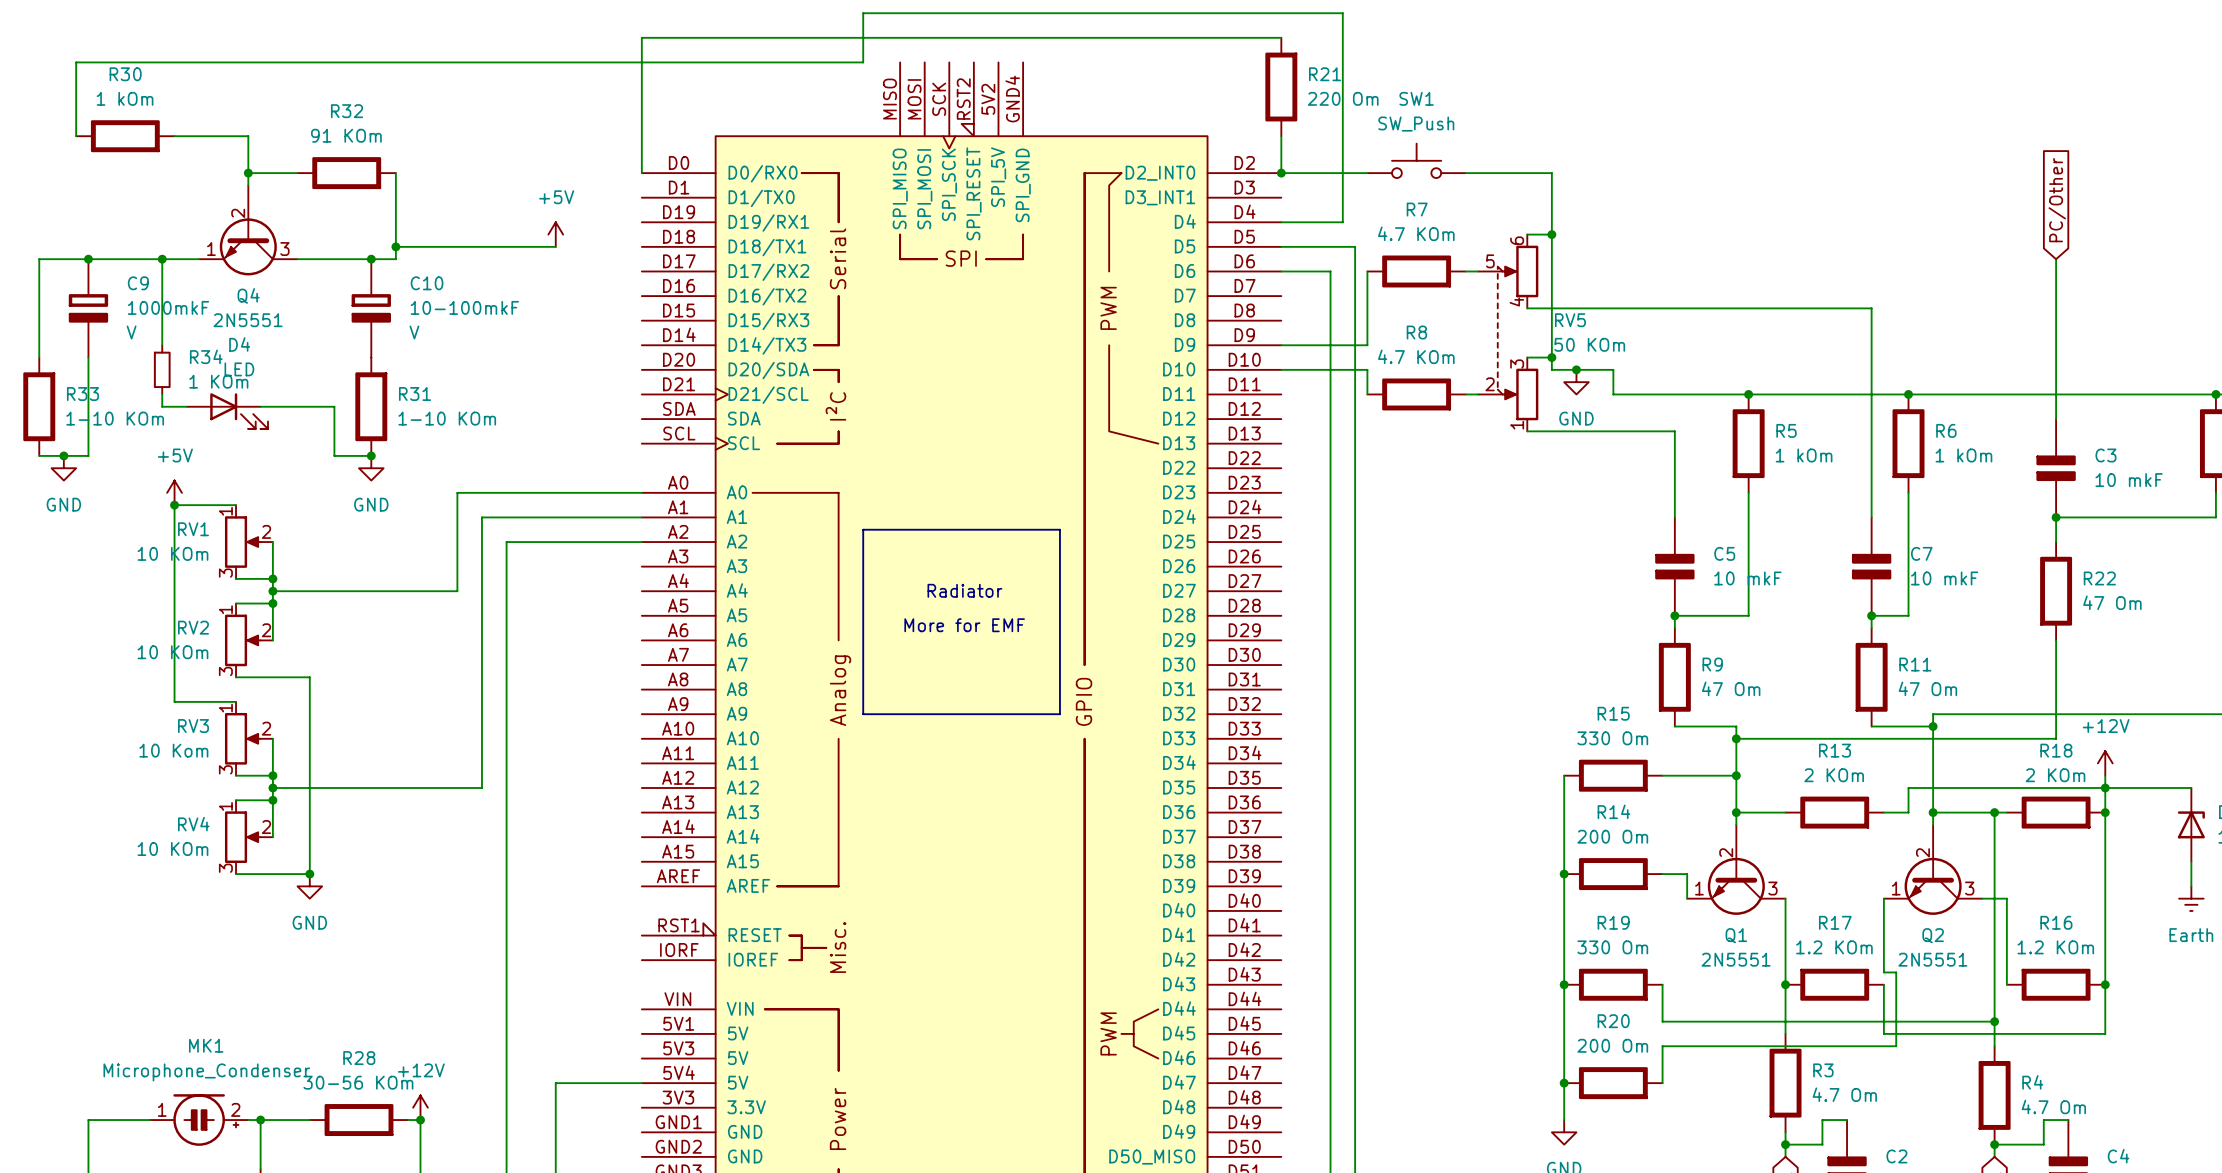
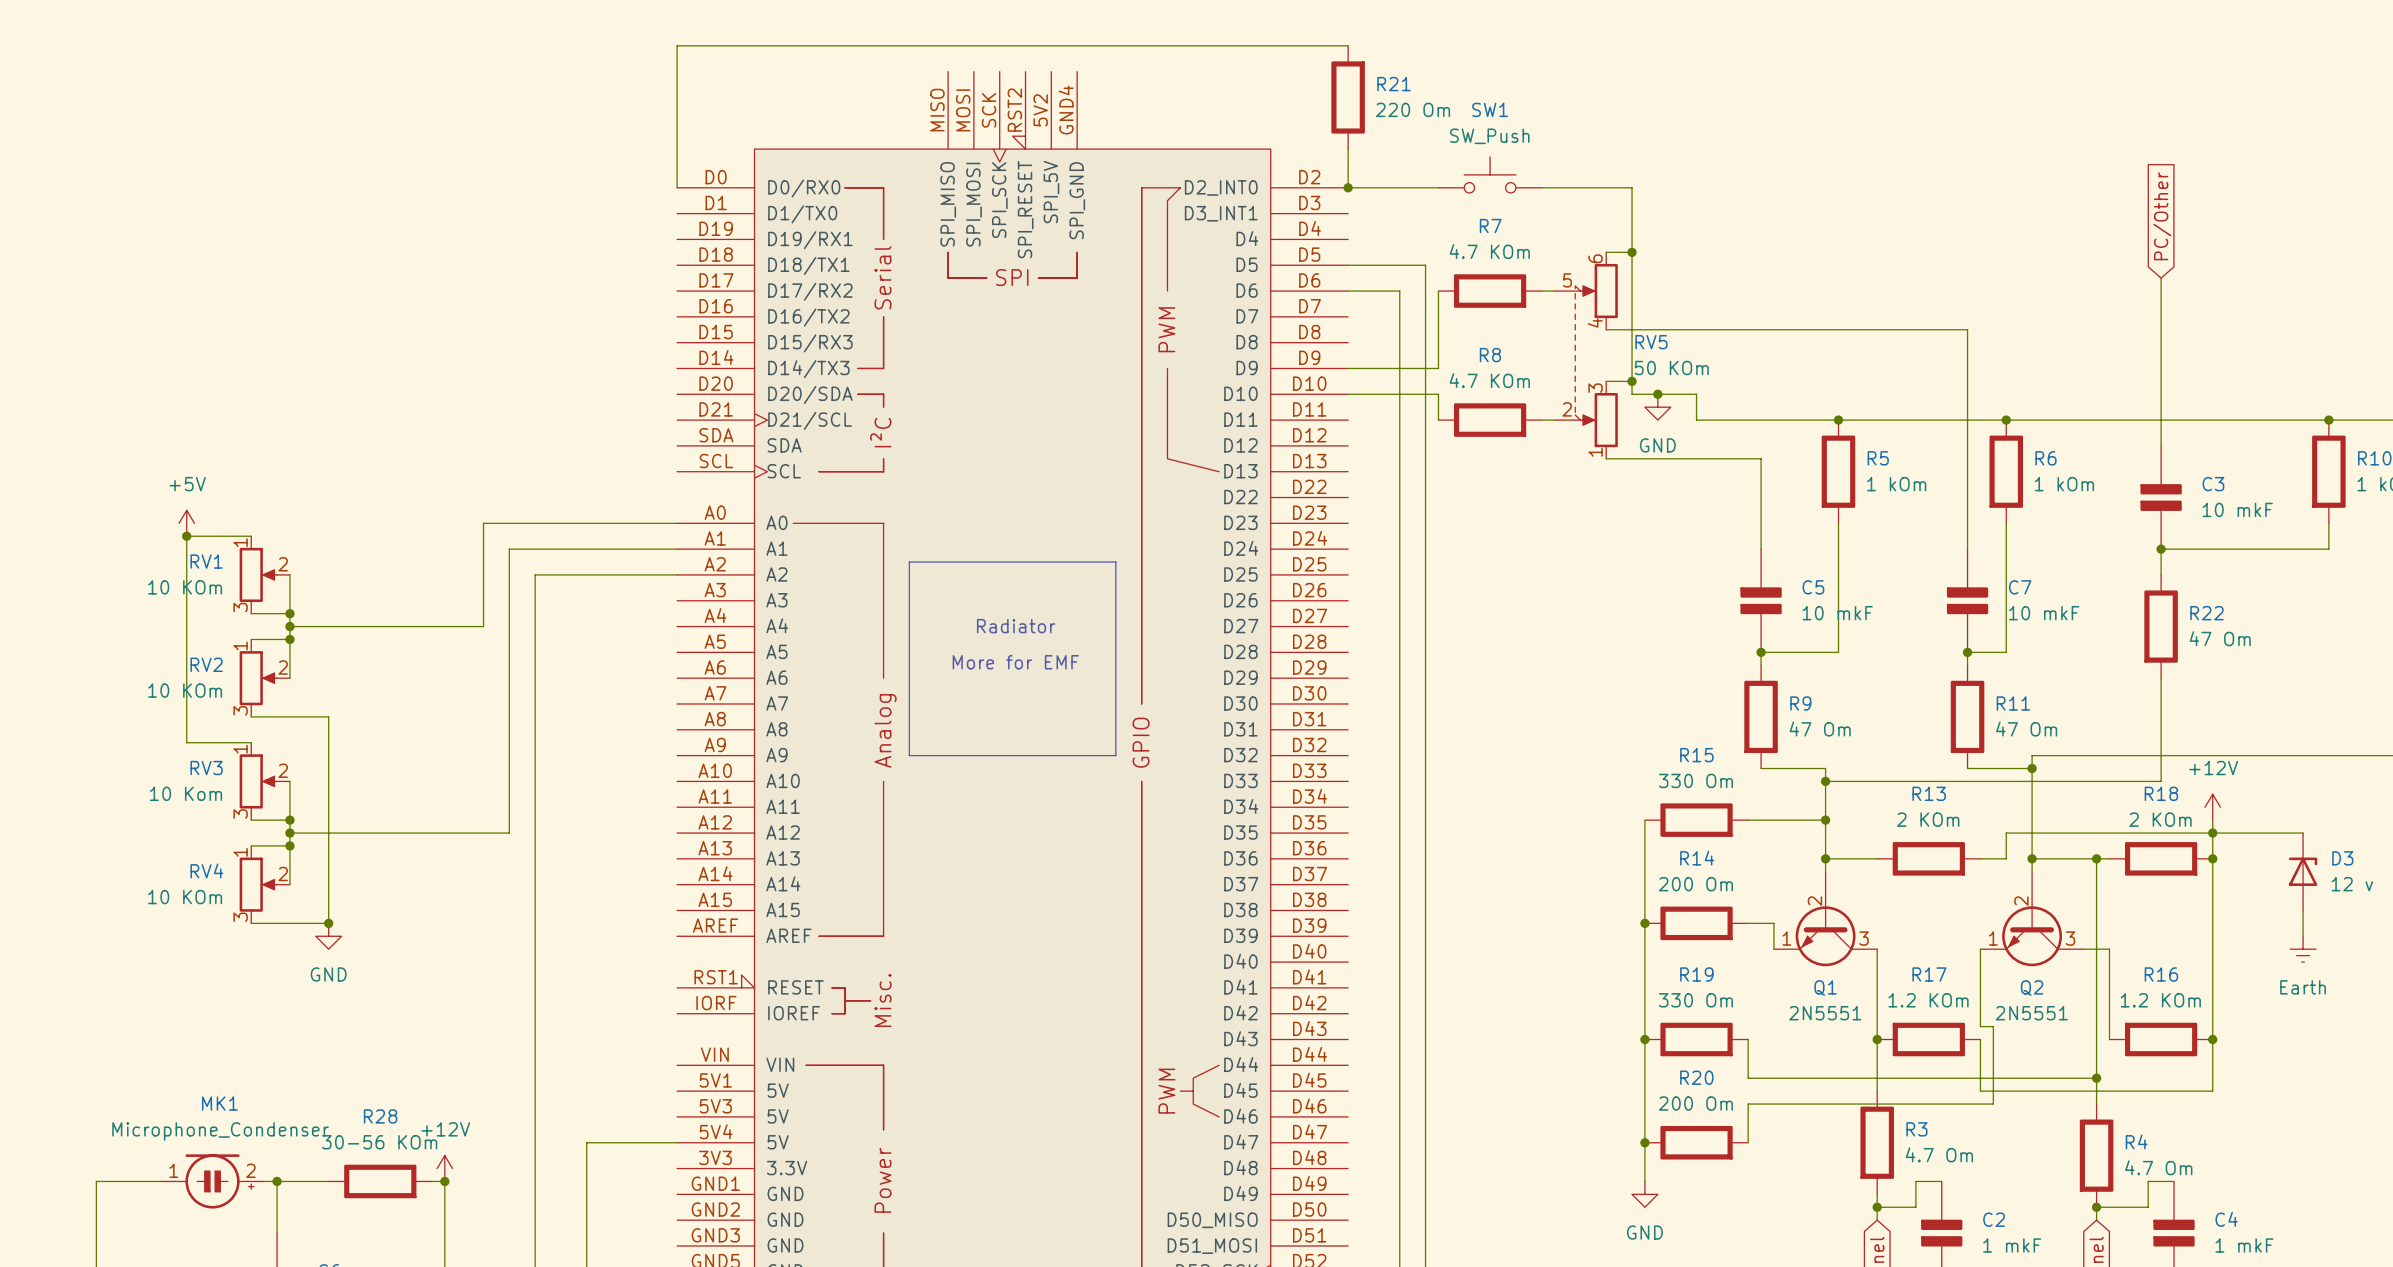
wire: (76, 136) (76, 62) (863, 62) (863, 13) (1342, 13) (1342, 222) (1281, 222) -> none
R30: 1 kOm (125, 136) -> none
wire: (174, 136) (248, 136) (248, 185) -> none
wire: (248, 173) (297, 173) -> none
junction: (248, 173) -> none
R32: 91 KOm (346, 173) -> none
wire: (395, 173) (395, 259) (297, 259) -> none
Q4: 2N5551 (248, 230) -> none
power symbol: +5V (555, 234) -> none
wire: (395, 246) (555, 246) -> none
junction: (395, 246) -> none
junction: (88, 259) -> none
wire: (162, 259) (162, 345) -> none
junction: (162, 259) -> none
wire: (199, 259) (39, 259) (39, 357) -> none
junction: (371, 259) -> none
C9: 1000mkF (88, 308) -> none
C10: 10-100mkF (371, 308) -> none
wire: (88, 357) (88, 455) (39, 455) -> none
R34: 1 KOm (162, 369) -> none
wire: (162, 394) (162, 406) (186, 406) -> none
R33: 1-10 KOm (39, 406) -> none
wire: (260, 406) (334, 406) (334, 455) (371, 455) -> none
R31: 1-10 KOm (371, 406) -> none
D4: LED (227, 411) -> none
junction: (63, 455) -> none
junction: (371, 455) -> none
power symbol: GND (63, 468) -> none
power symbol: GND (371, 468) -> none

